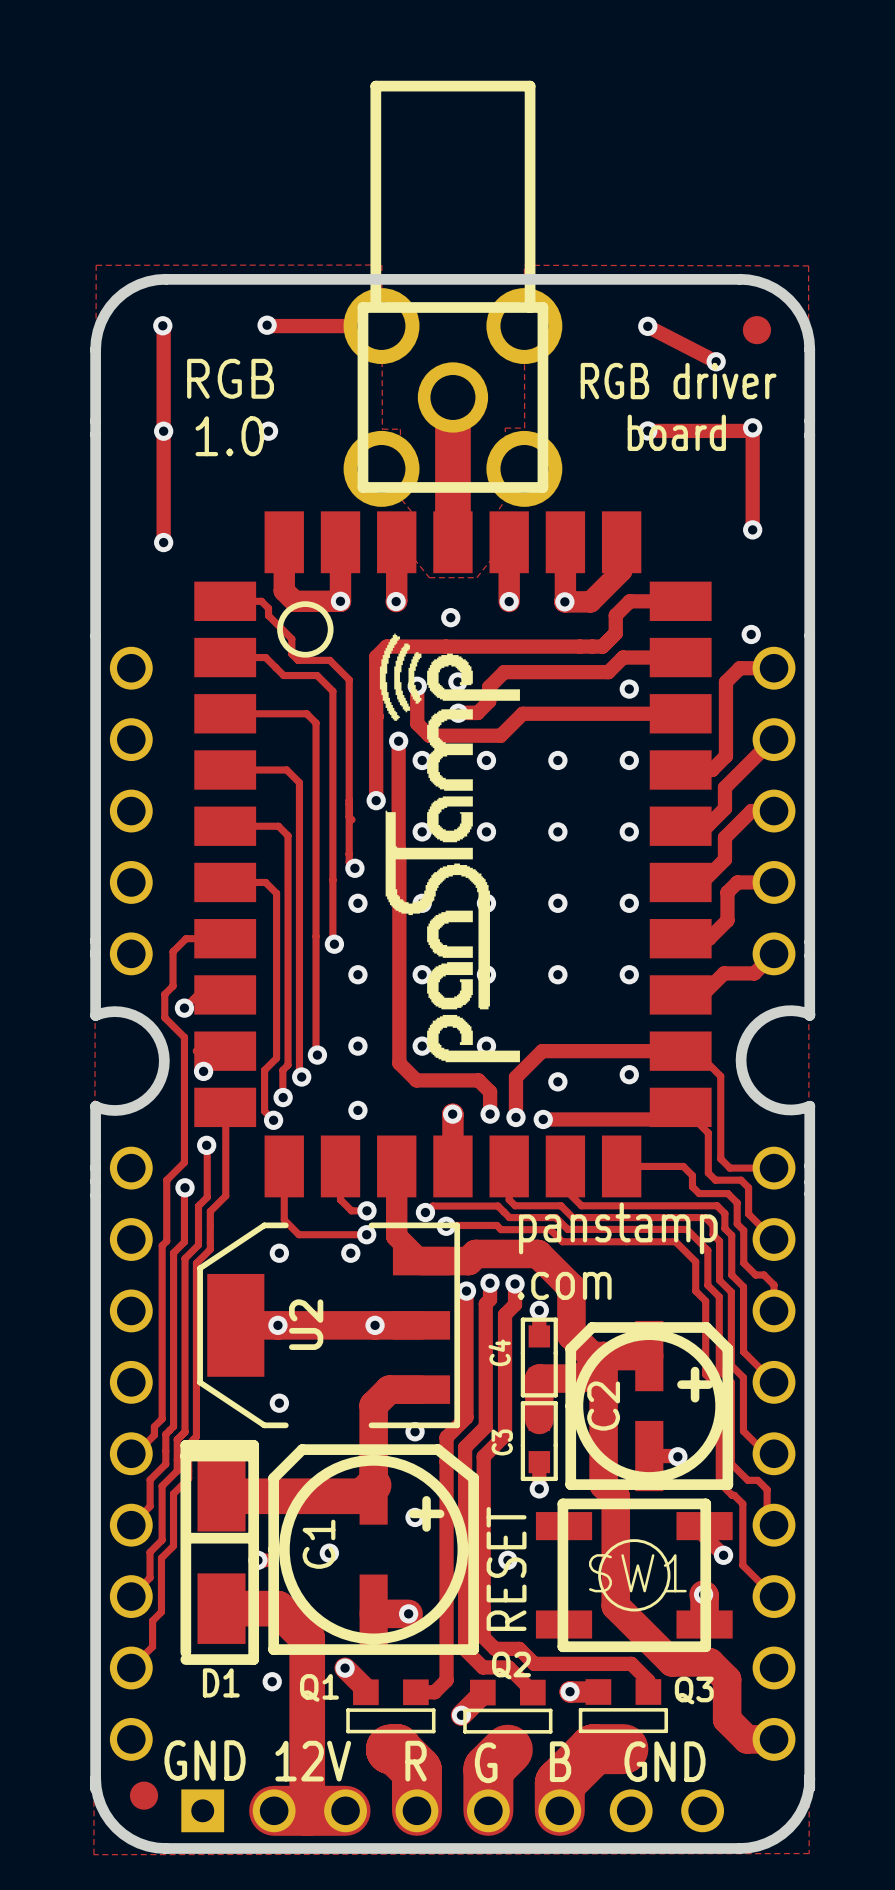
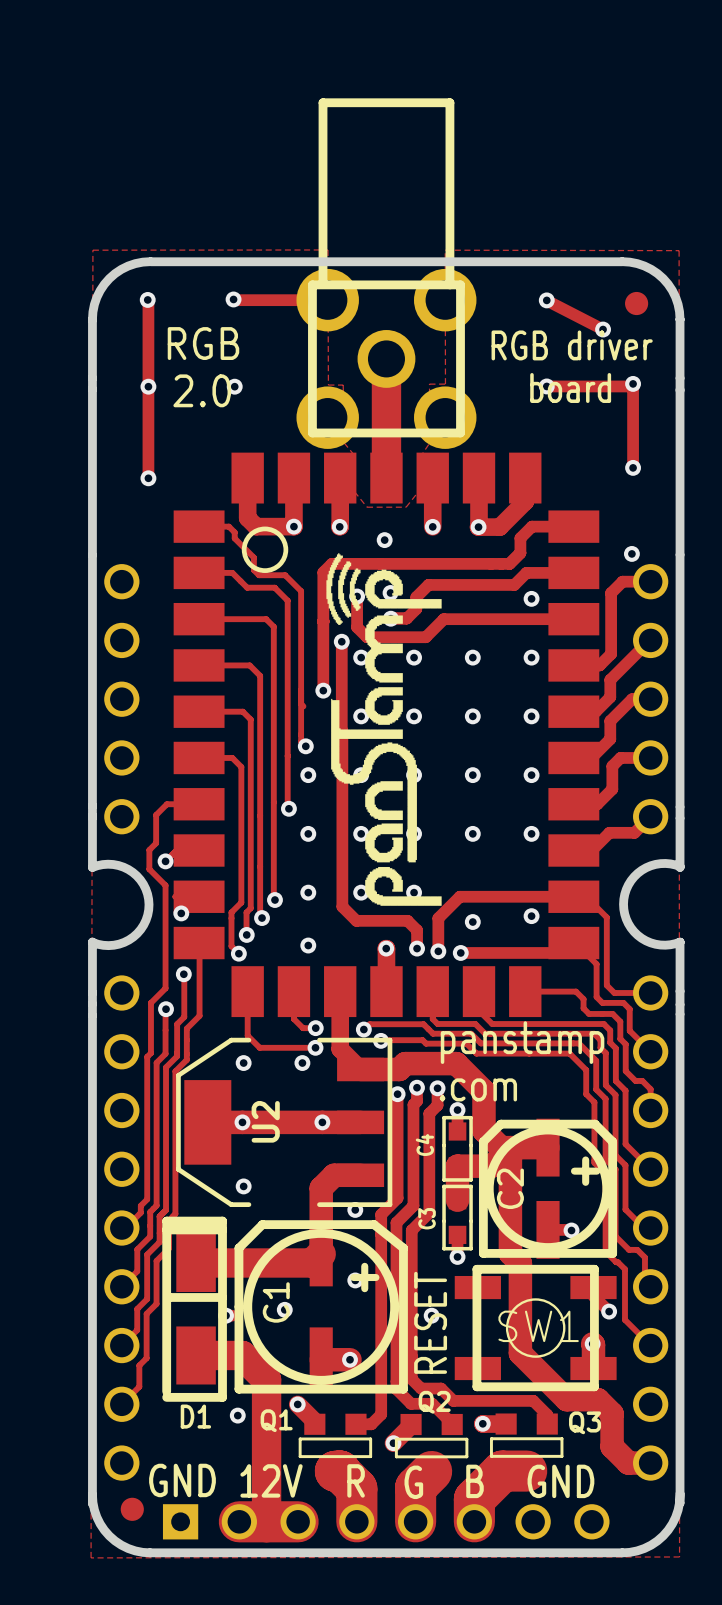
text: 1.0 (229, 436) -> 2.0 (202, 390)

